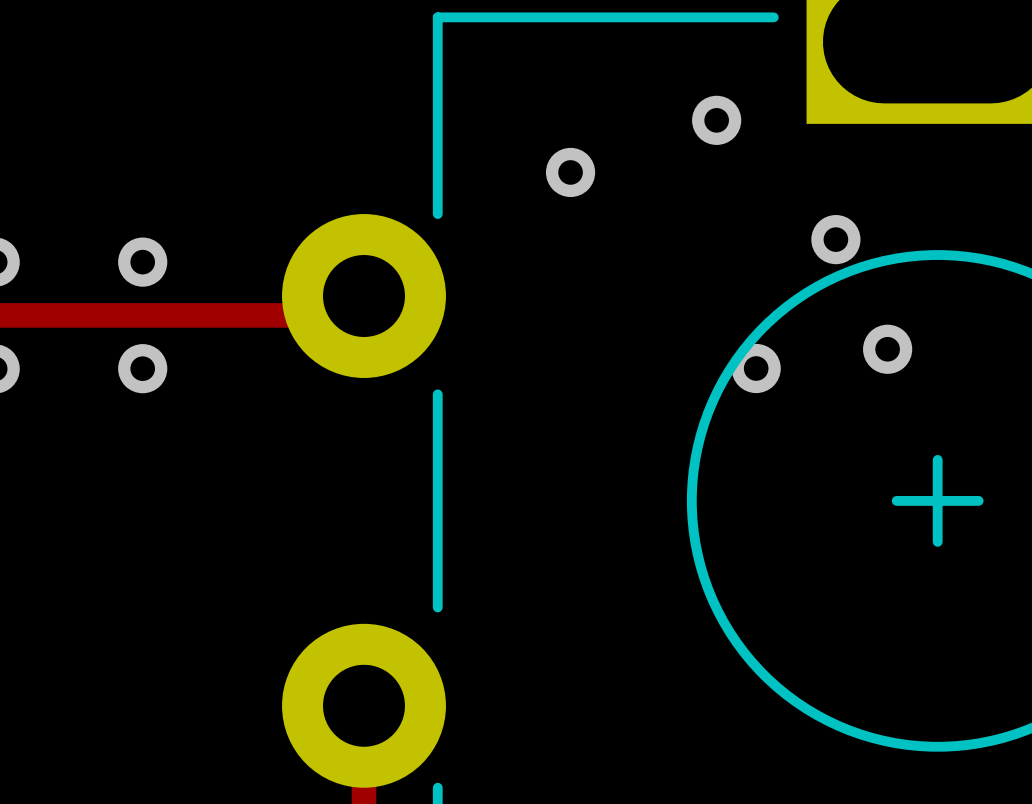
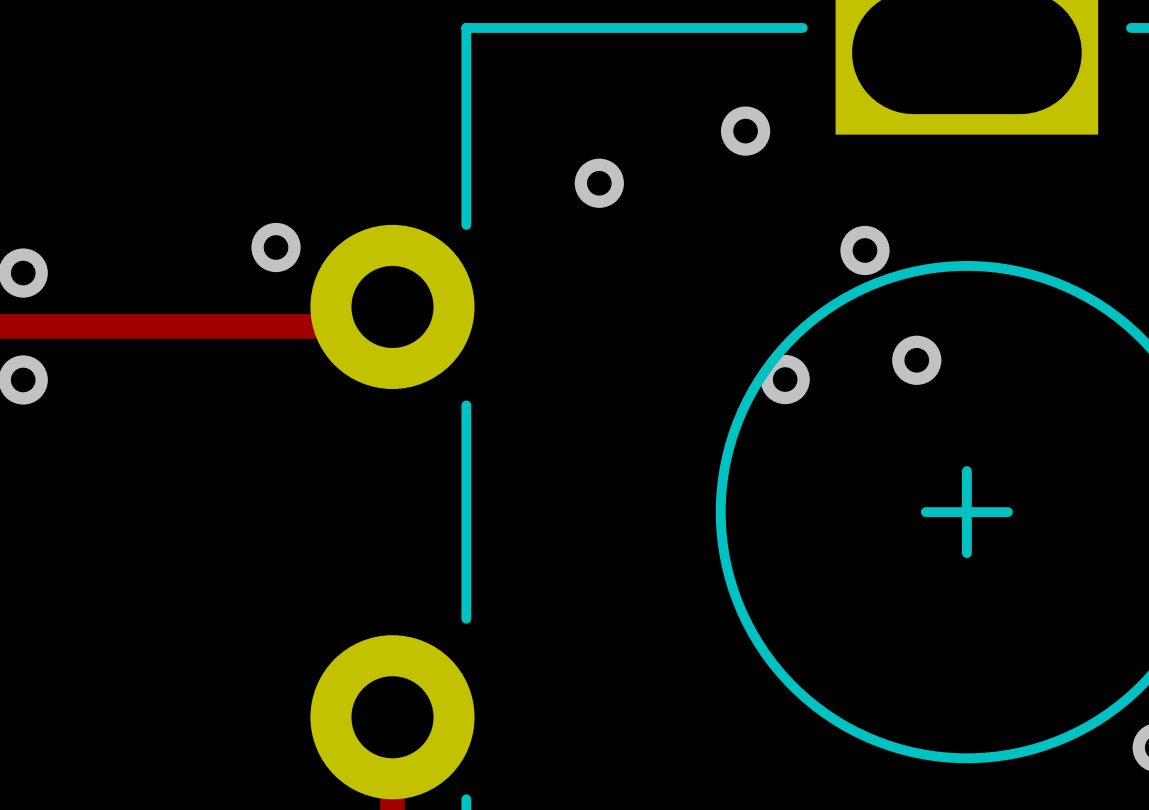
via: none -> (276, 247)
via: (142, 262) -> none
via: (142, 368) -> none

